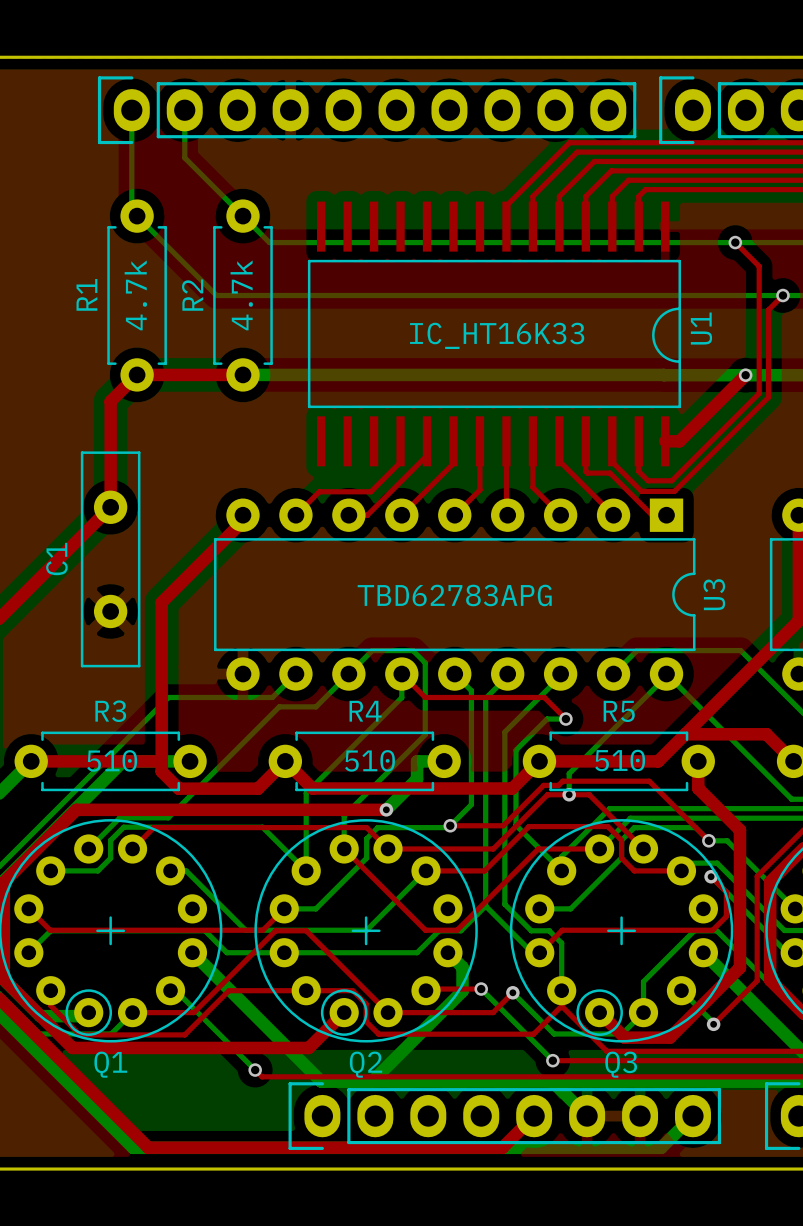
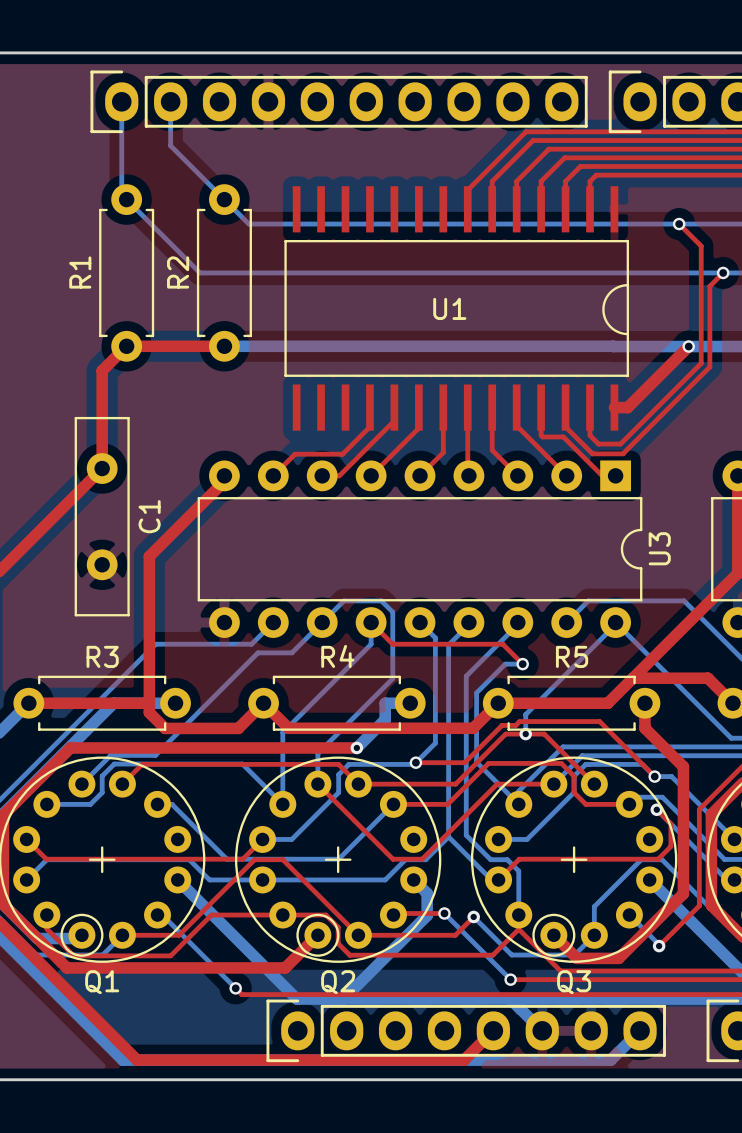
R1 value: 4.7k (135, 295) -> none
R2 value: 4.7k (241, 295) -> none
U1 name rotation: 0° (701, 328) -> 90° clockwise (449, 308)
U1 name position: U1 (701, 328) -> U1 (449, 308)
U1 value: IC_HT16K33 (497, 335) -> none
C1 name position: C1 (56, 559) -> C1 (149, 516)
U3 value: TBD62783APG (454, 595) -> none
R3 value: 510 (112, 760) -> none
R4 value: 510 (369, 760) -> none
R5 value: 510 (620, 760) -> none

